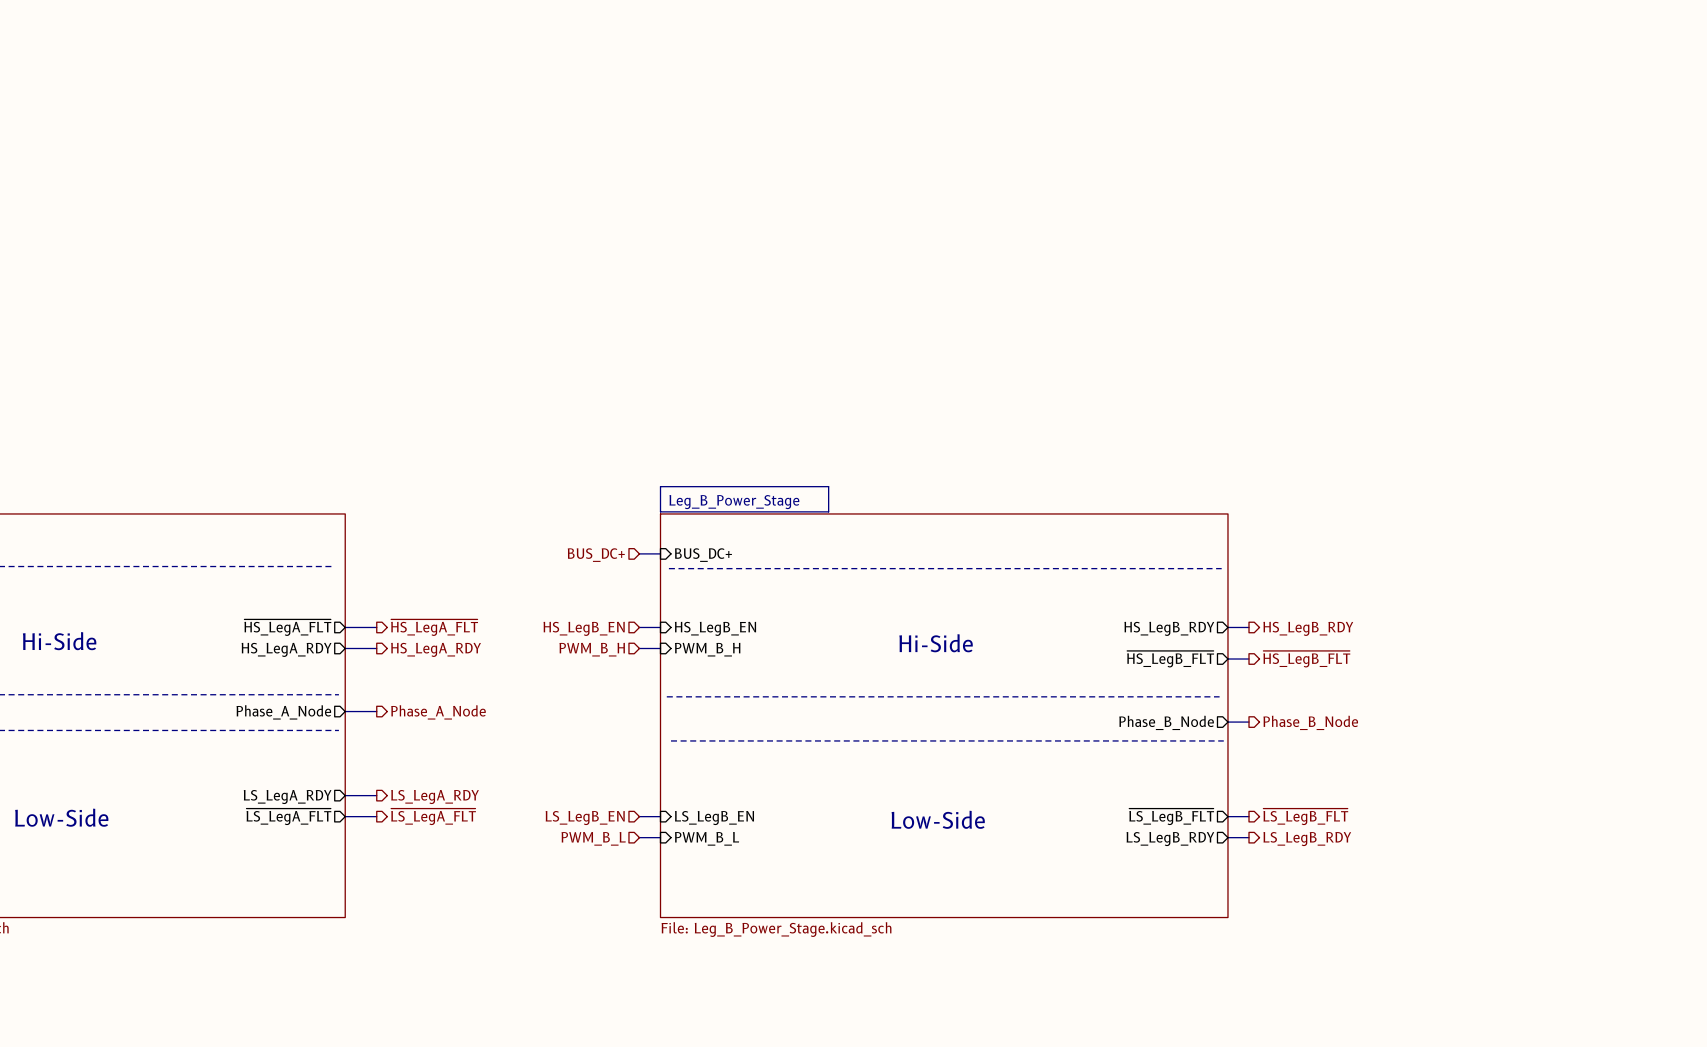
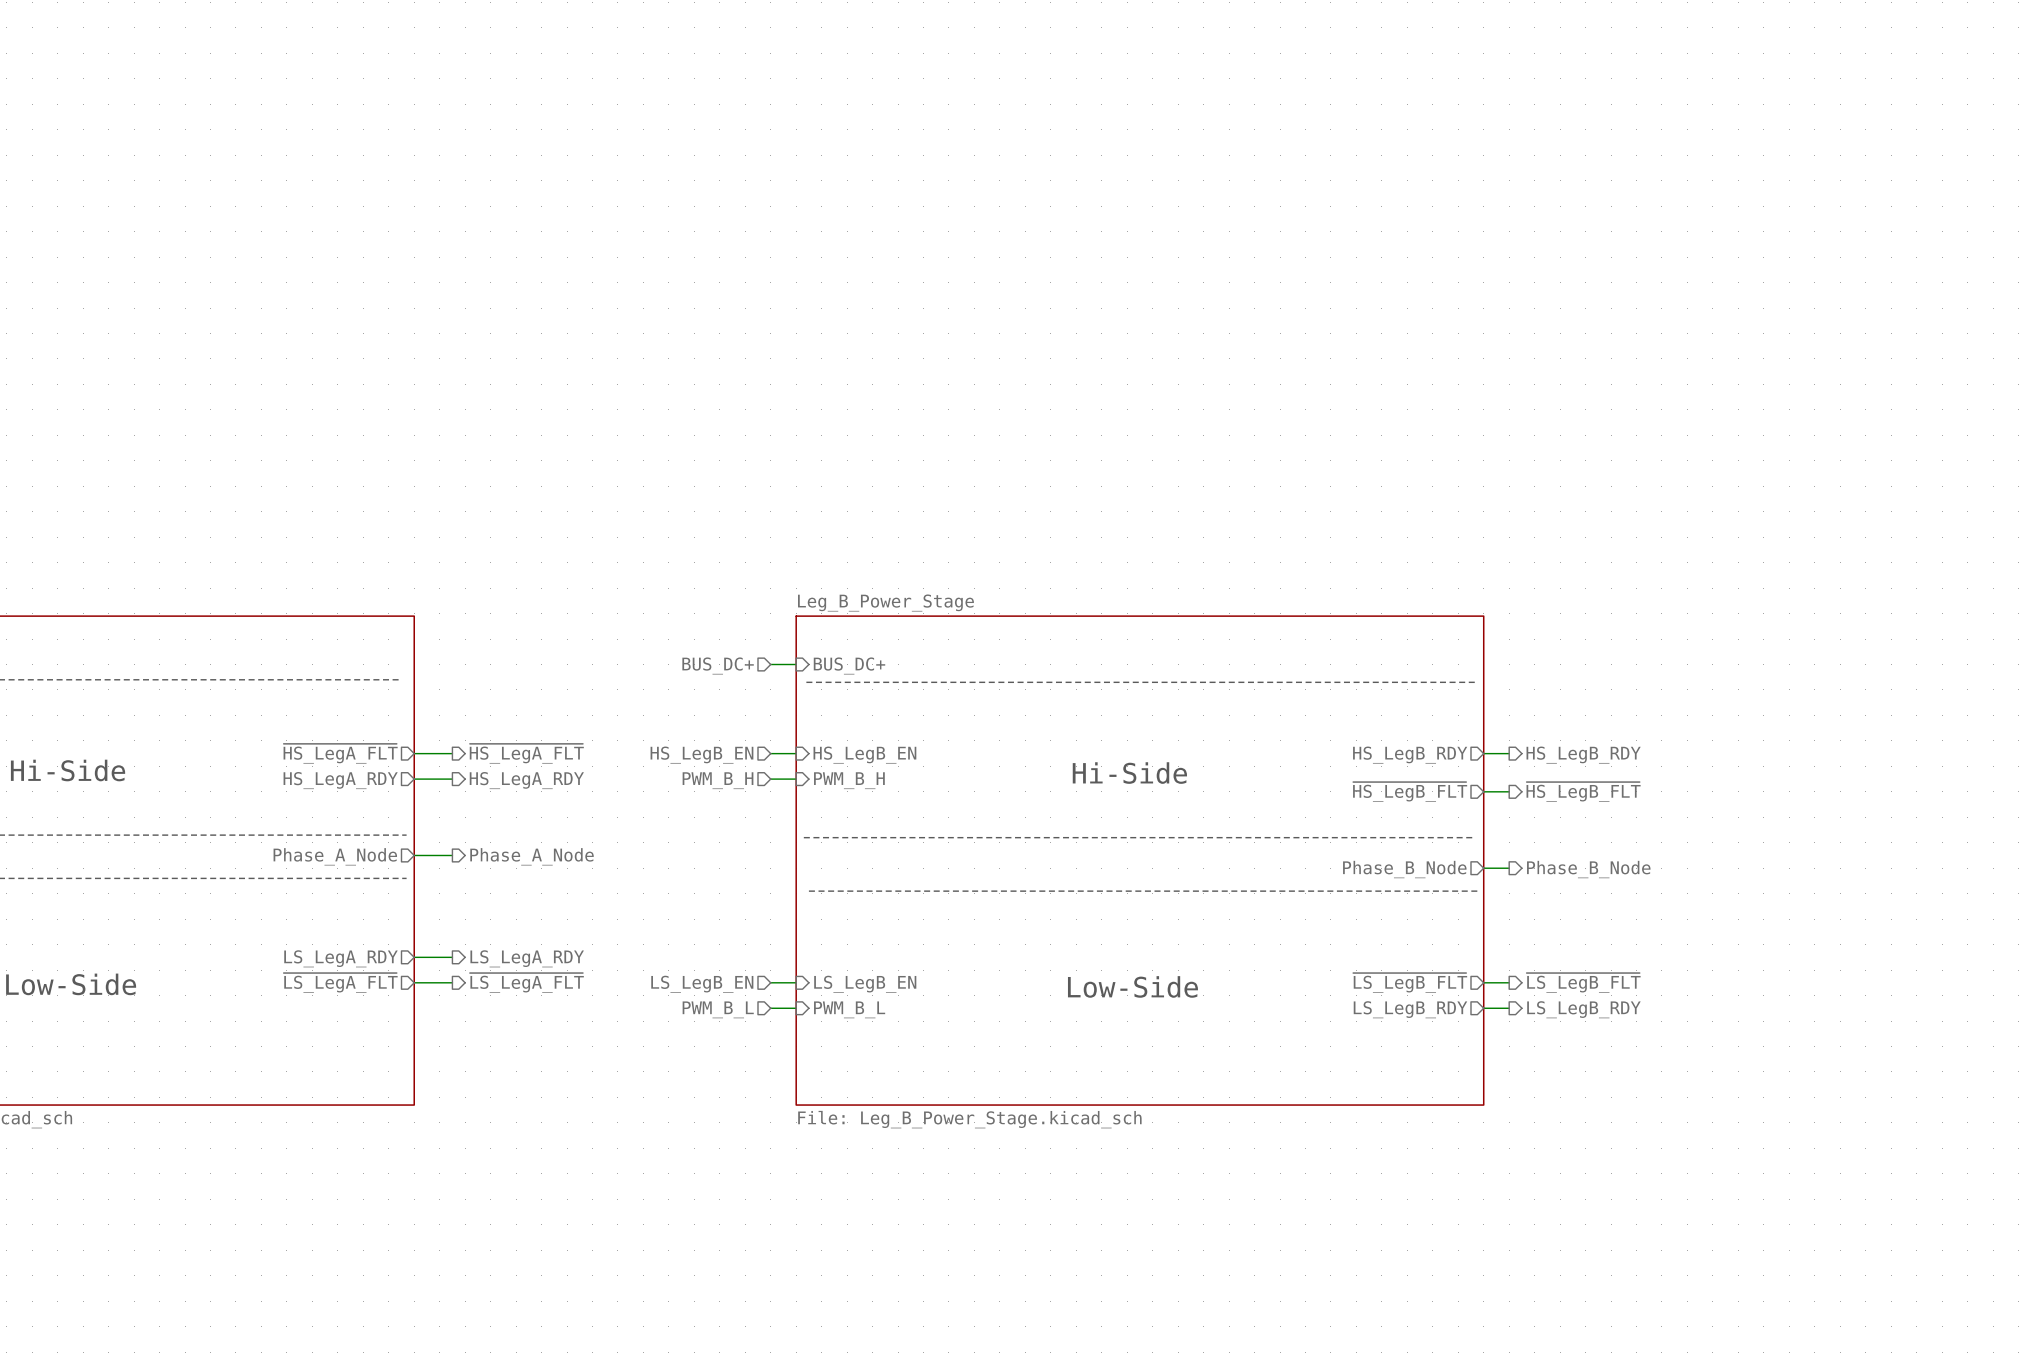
line: (660, 486) (828, 486) (828, 511) (660, 511) (660, 486) -> none
text: Leg_B_Power_Stage (734, 502) -> none
sheet Leg_B_Power_Stage name: none -> Leg_B_Power_Stage (885, 603)

